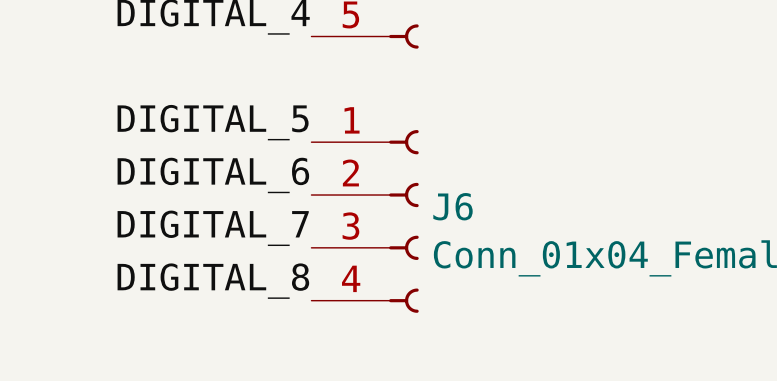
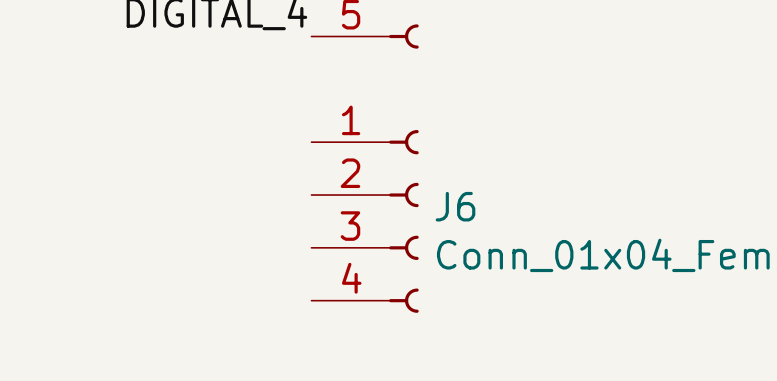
label: DIGITAL_5 (213, 122) -> none
label: DIGITAL_6 (213, 175) -> none
label: DIGITAL_7 (213, 228) -> none
label: DIGITAL_8 (213, 281) -> none

